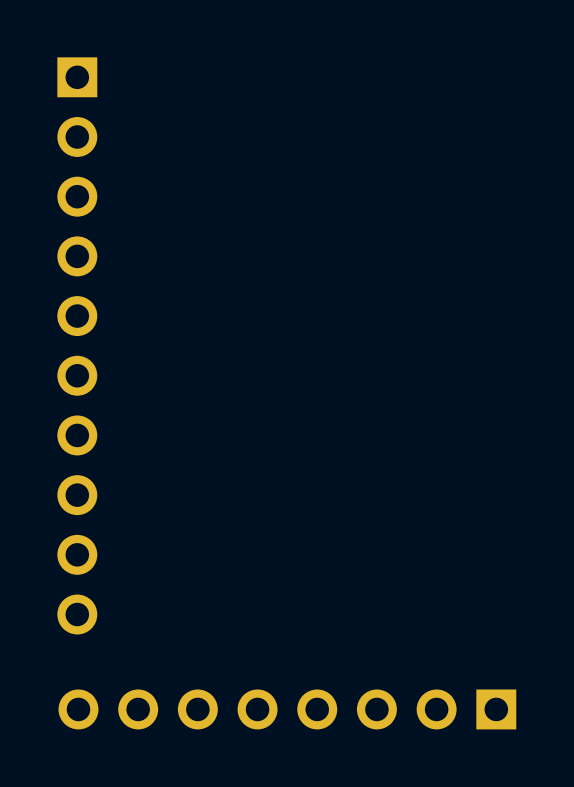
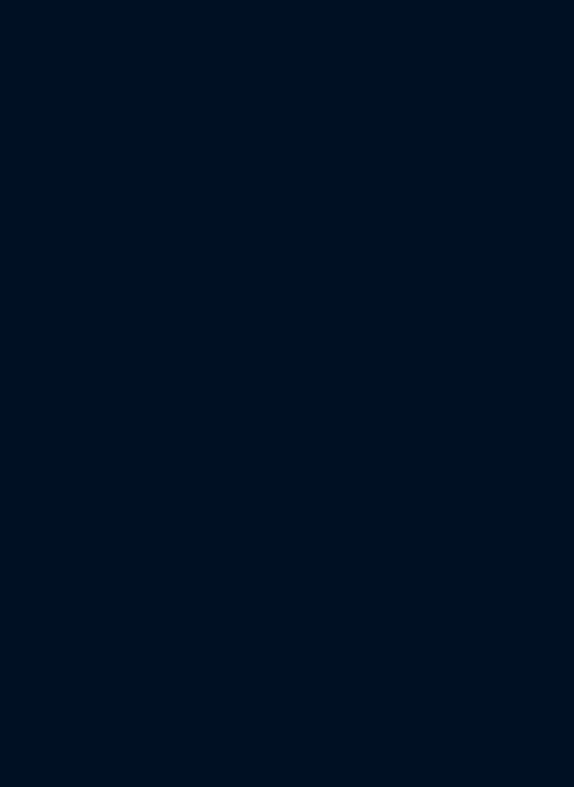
part: (77, 345) -> none
part: (287, 709) -> none

